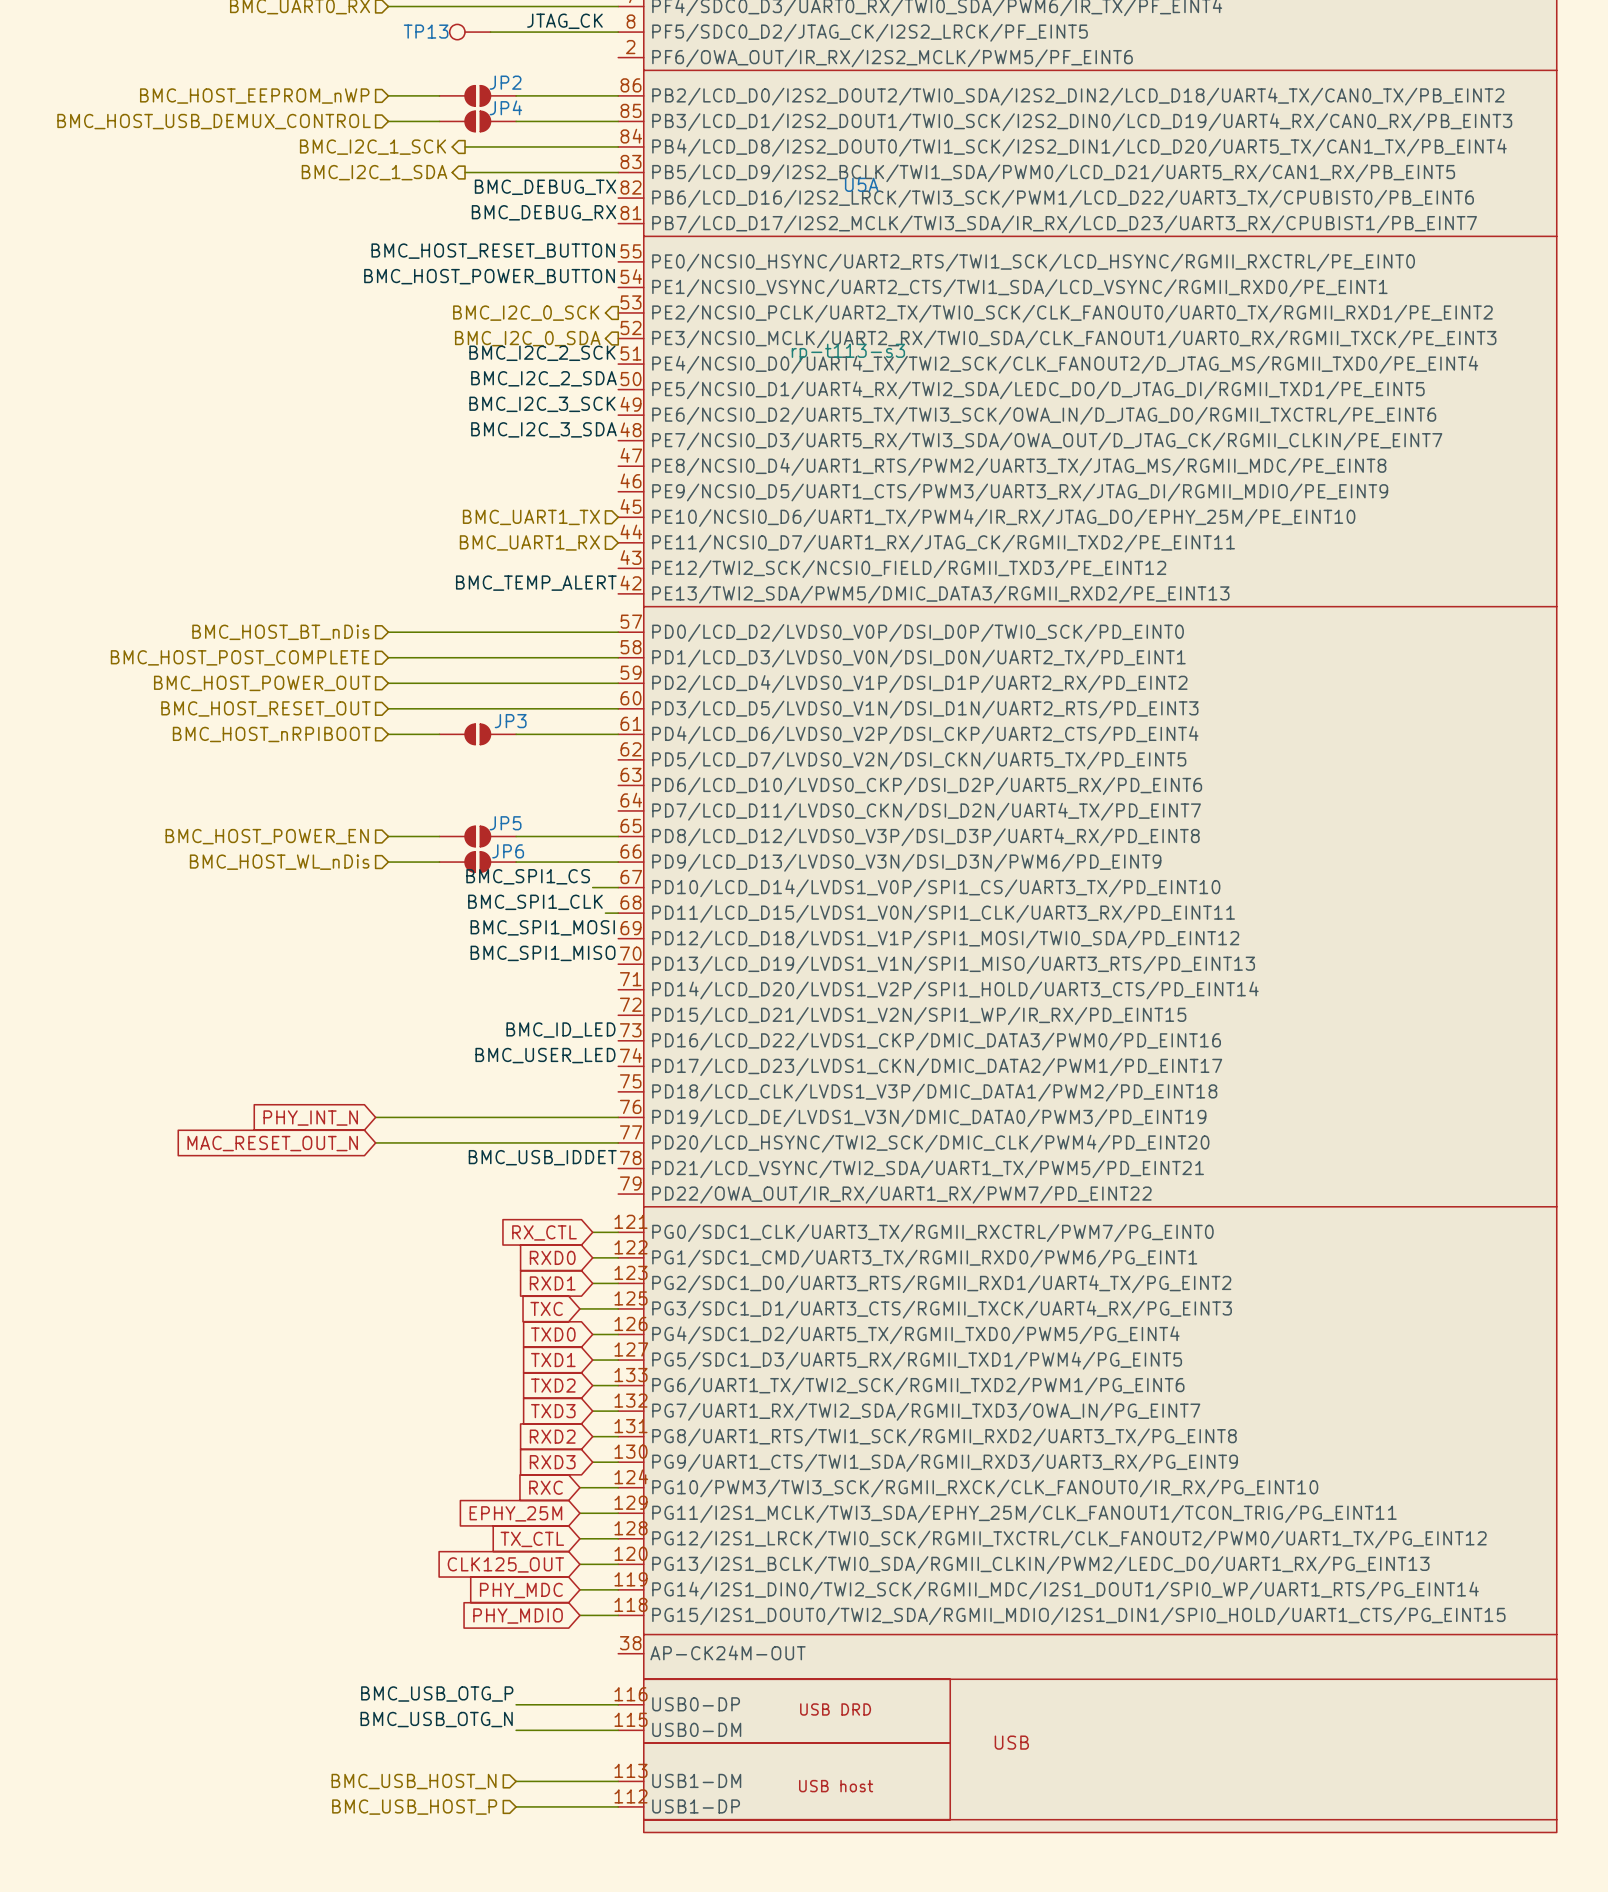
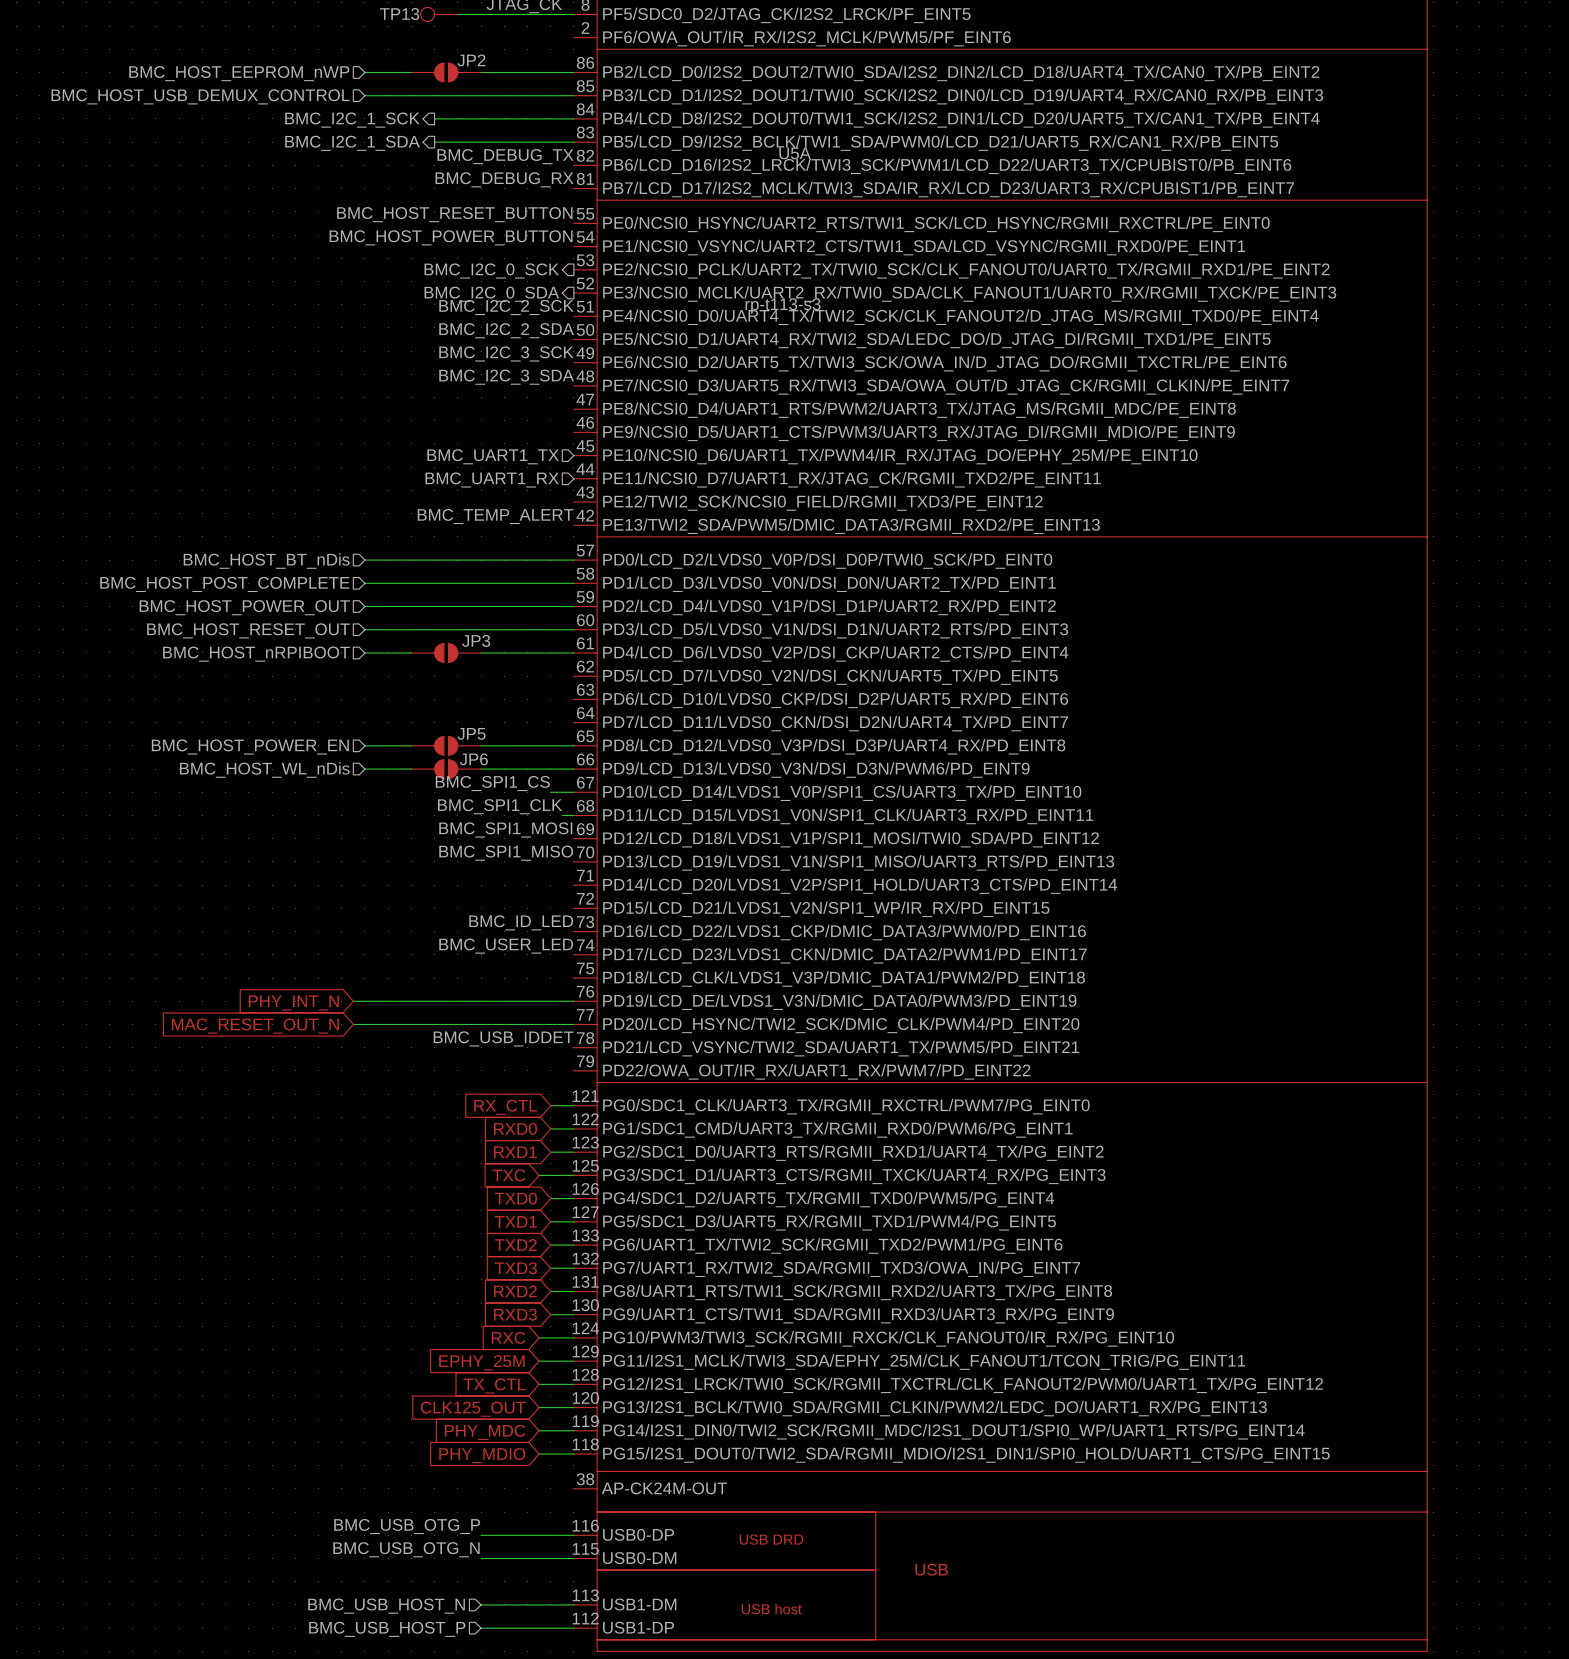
JP4: (477, 121) -> none

